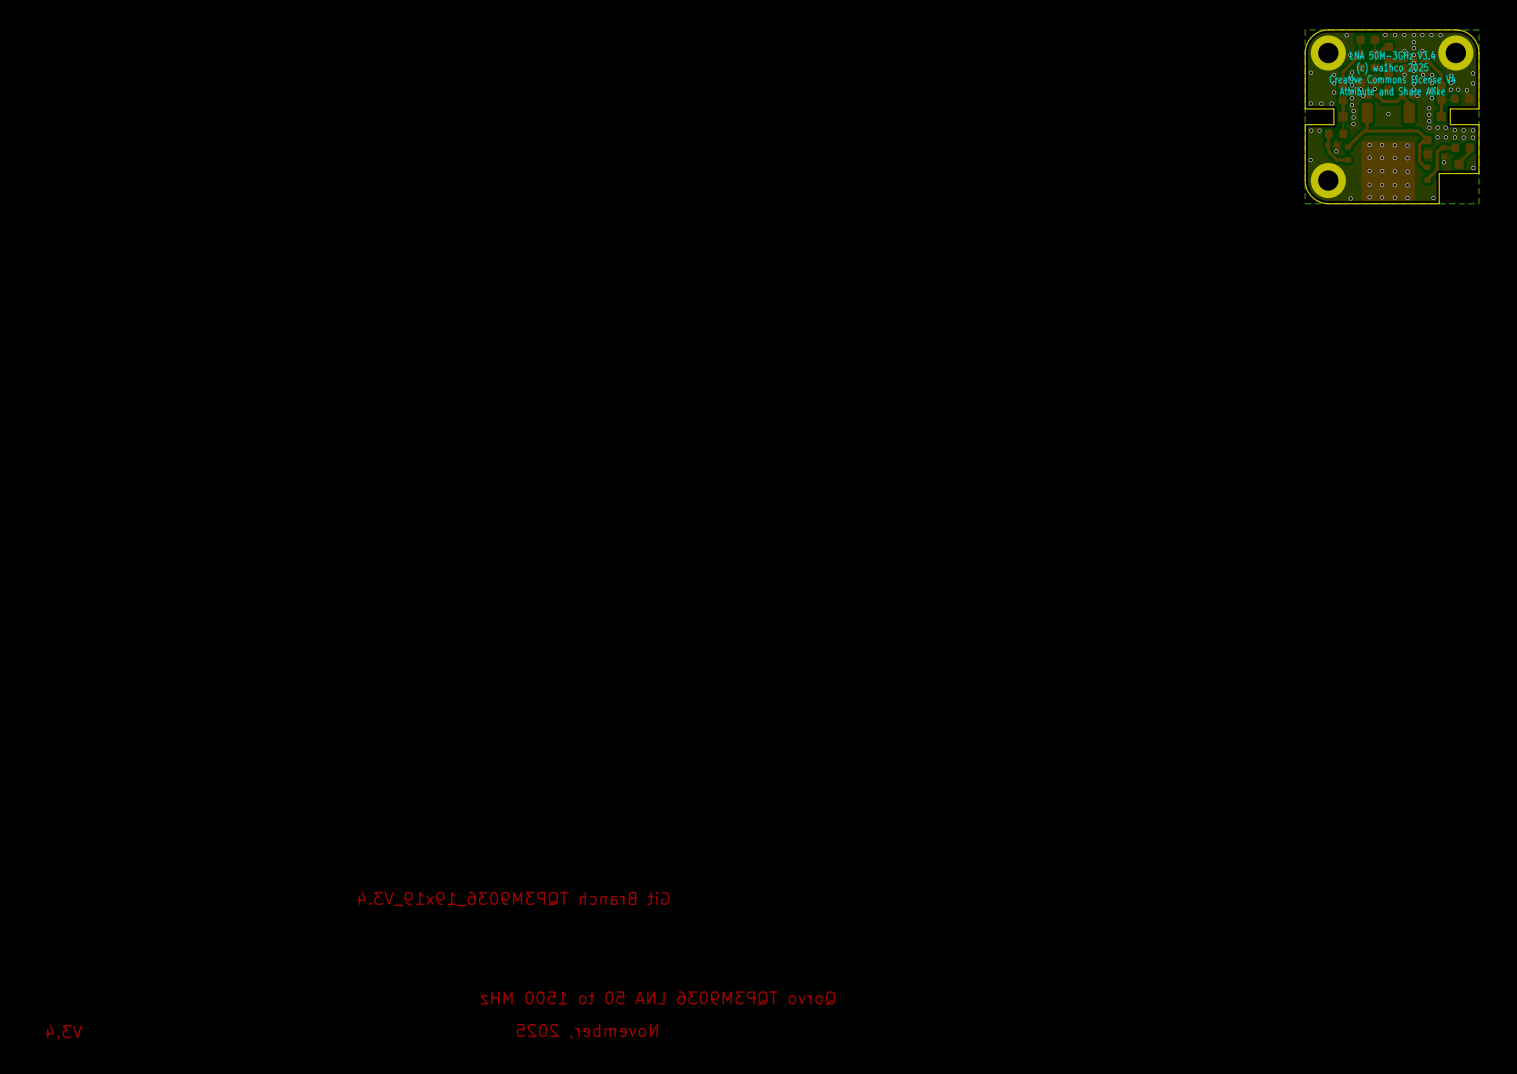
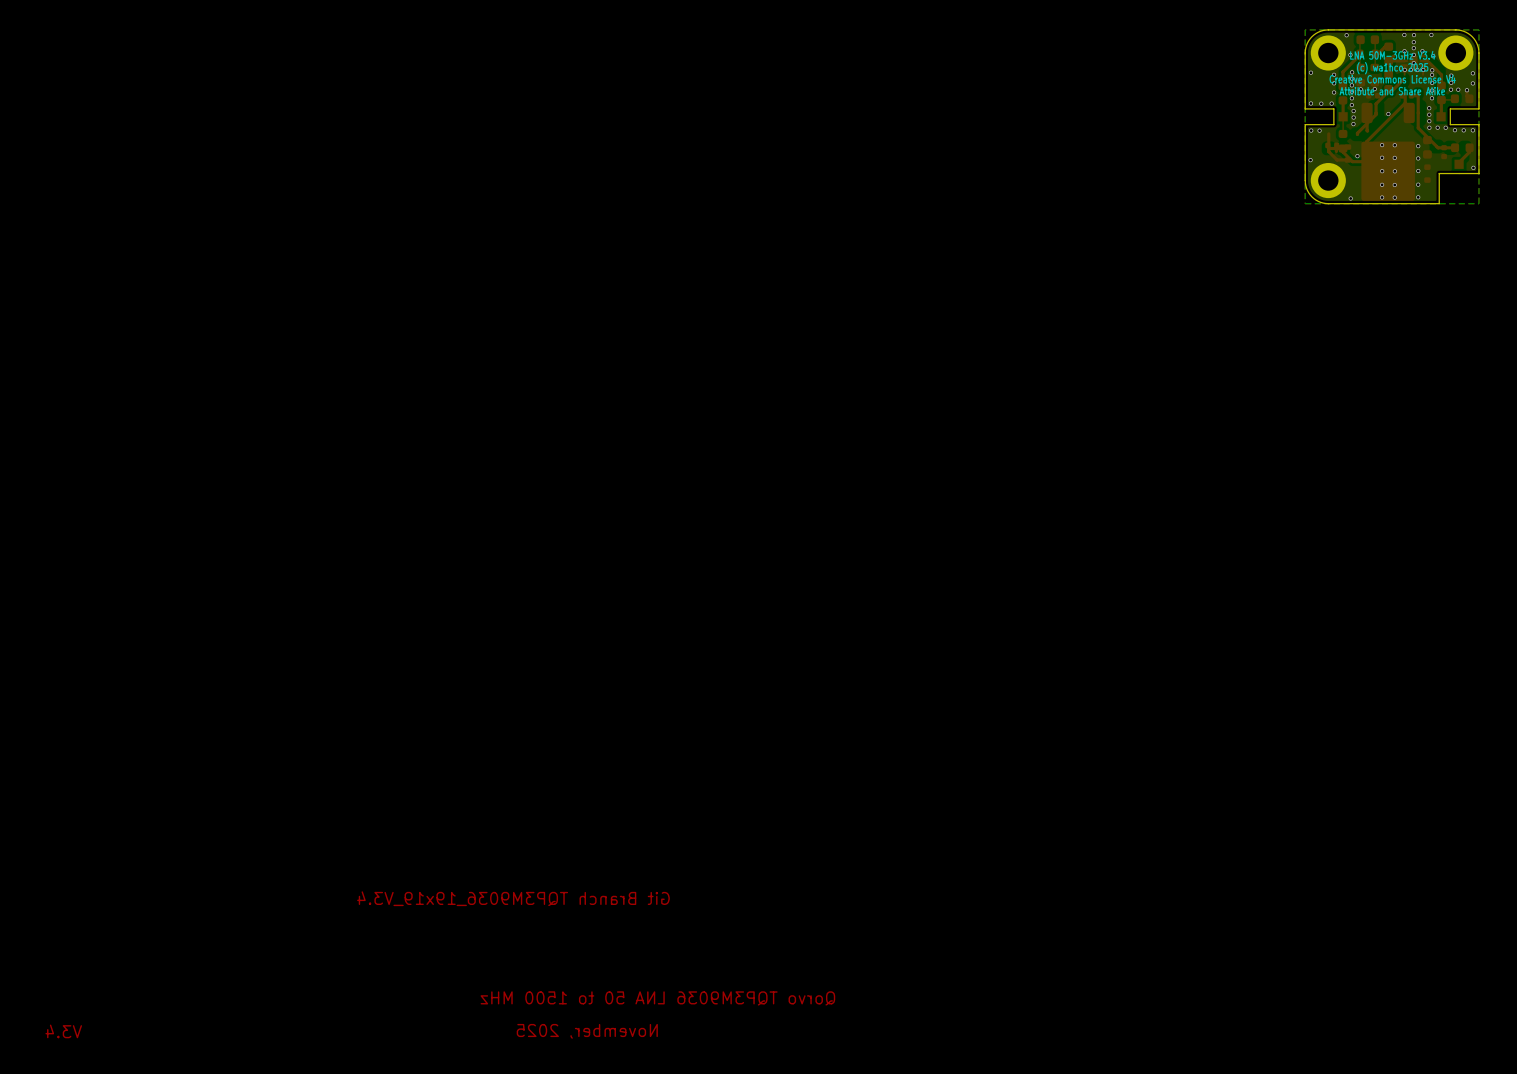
via: (1385, 34) -> none
via: (1395, 34) -> none
via: (1422, 34) -> none
via: (1440, 35) -> none
via: none -> (1404, 69)
via: none -> (1423, 69)
via: none -> (1410, 70)
via: (1413, 70) -> none
via: none -> (1417, 70)
via: none -> (1432, 70)
via: (1404, 74) -> none
via: (1423, 74) -> none
via: (1413, 77) -> none
top track: none -> (1402, 80) (1376, 103) (1376, 114) (1357, 134)
via: (1413, 83) -> none
top track: (1388, 89) (1377, 95) (1383, 101) (1396, 101) (1402, 95) (1409, 103) (1409, 112) -> none
via: (1413, 89) -> none
top track: none -> (1405, 93) (1405, 103) (1366, 141) (1366, 157) (1362, 161) (1352, 161) (1343, 152) (1343, 148) (1328, 148)
top track: none -> (1418, 93) (1418, 127) (1438, 147) (1450, 147)
via: (1363, 95) -> none
via: (1417, 95) -> none
part rotation: 0° (1336, 133) -> 90° clockwise (1343, 141)
via: (1437, 137) -> none
via: (1445, 137) -> none
via: (1454, 137) -> none
via: (1463, 137) -> none
via: (1472, 137) -> none
via: (1369, 144) -> none
via: (1407, 145) -> none
via: none -> (1418, 146)
top track: (1347, 147) (1363, 131) (1418, 131) (1427, 140) (1424, 140) (1419, 145) (1419, 161) (1427, 167) -> none
top track: (1455, 147) (1441, 147) (1437, 152) (1437, 169) (1427, 180) -> none
via: (1336, 151) -> none
via: none -> (1357, 156)
via: (1369, 157) -> none
via: (1407, 158) -> none
via: none -> (1418, 158)
via: (1444, 162) -> none
via: (1369, 171) -> none
via: (1407, 171) -> none
via: none -> (1418, 171)
via: (1369, 184) -> none
via: none -> (1418, 184)
via: (1407, 185) -> none
via: (1369, 197) -> none
via: (1407, 197) -> none
via: none -> (1418, 197)
via: (1433, 197) -> none

